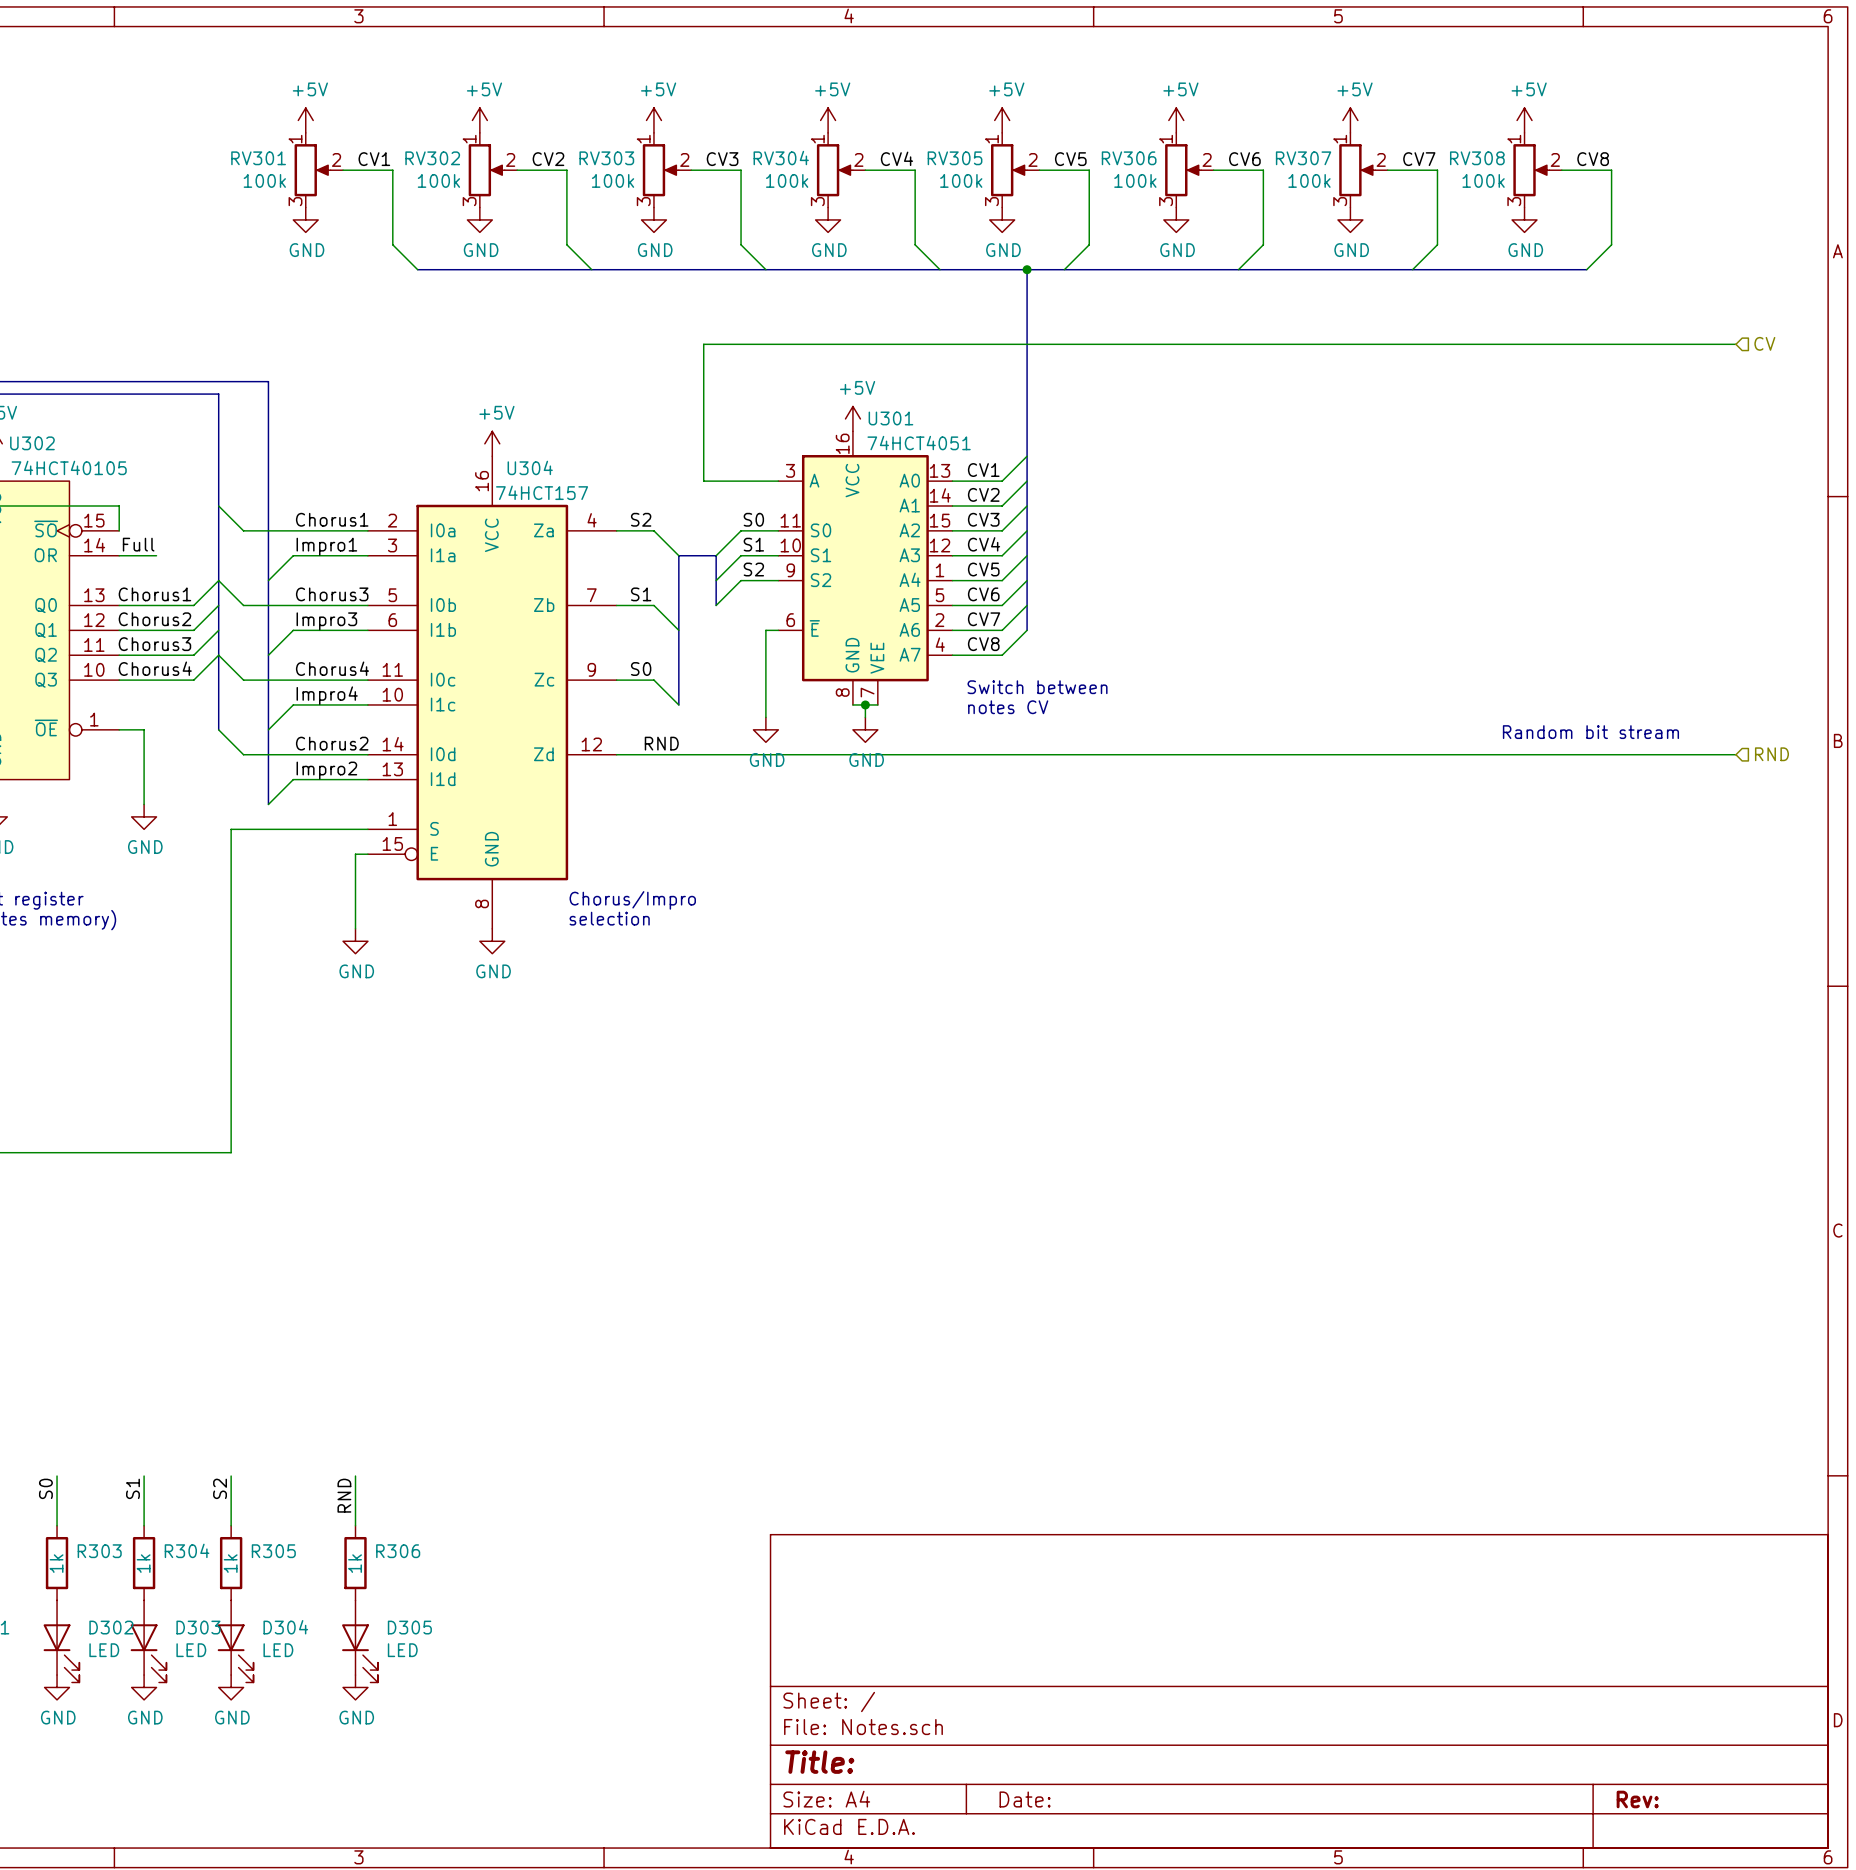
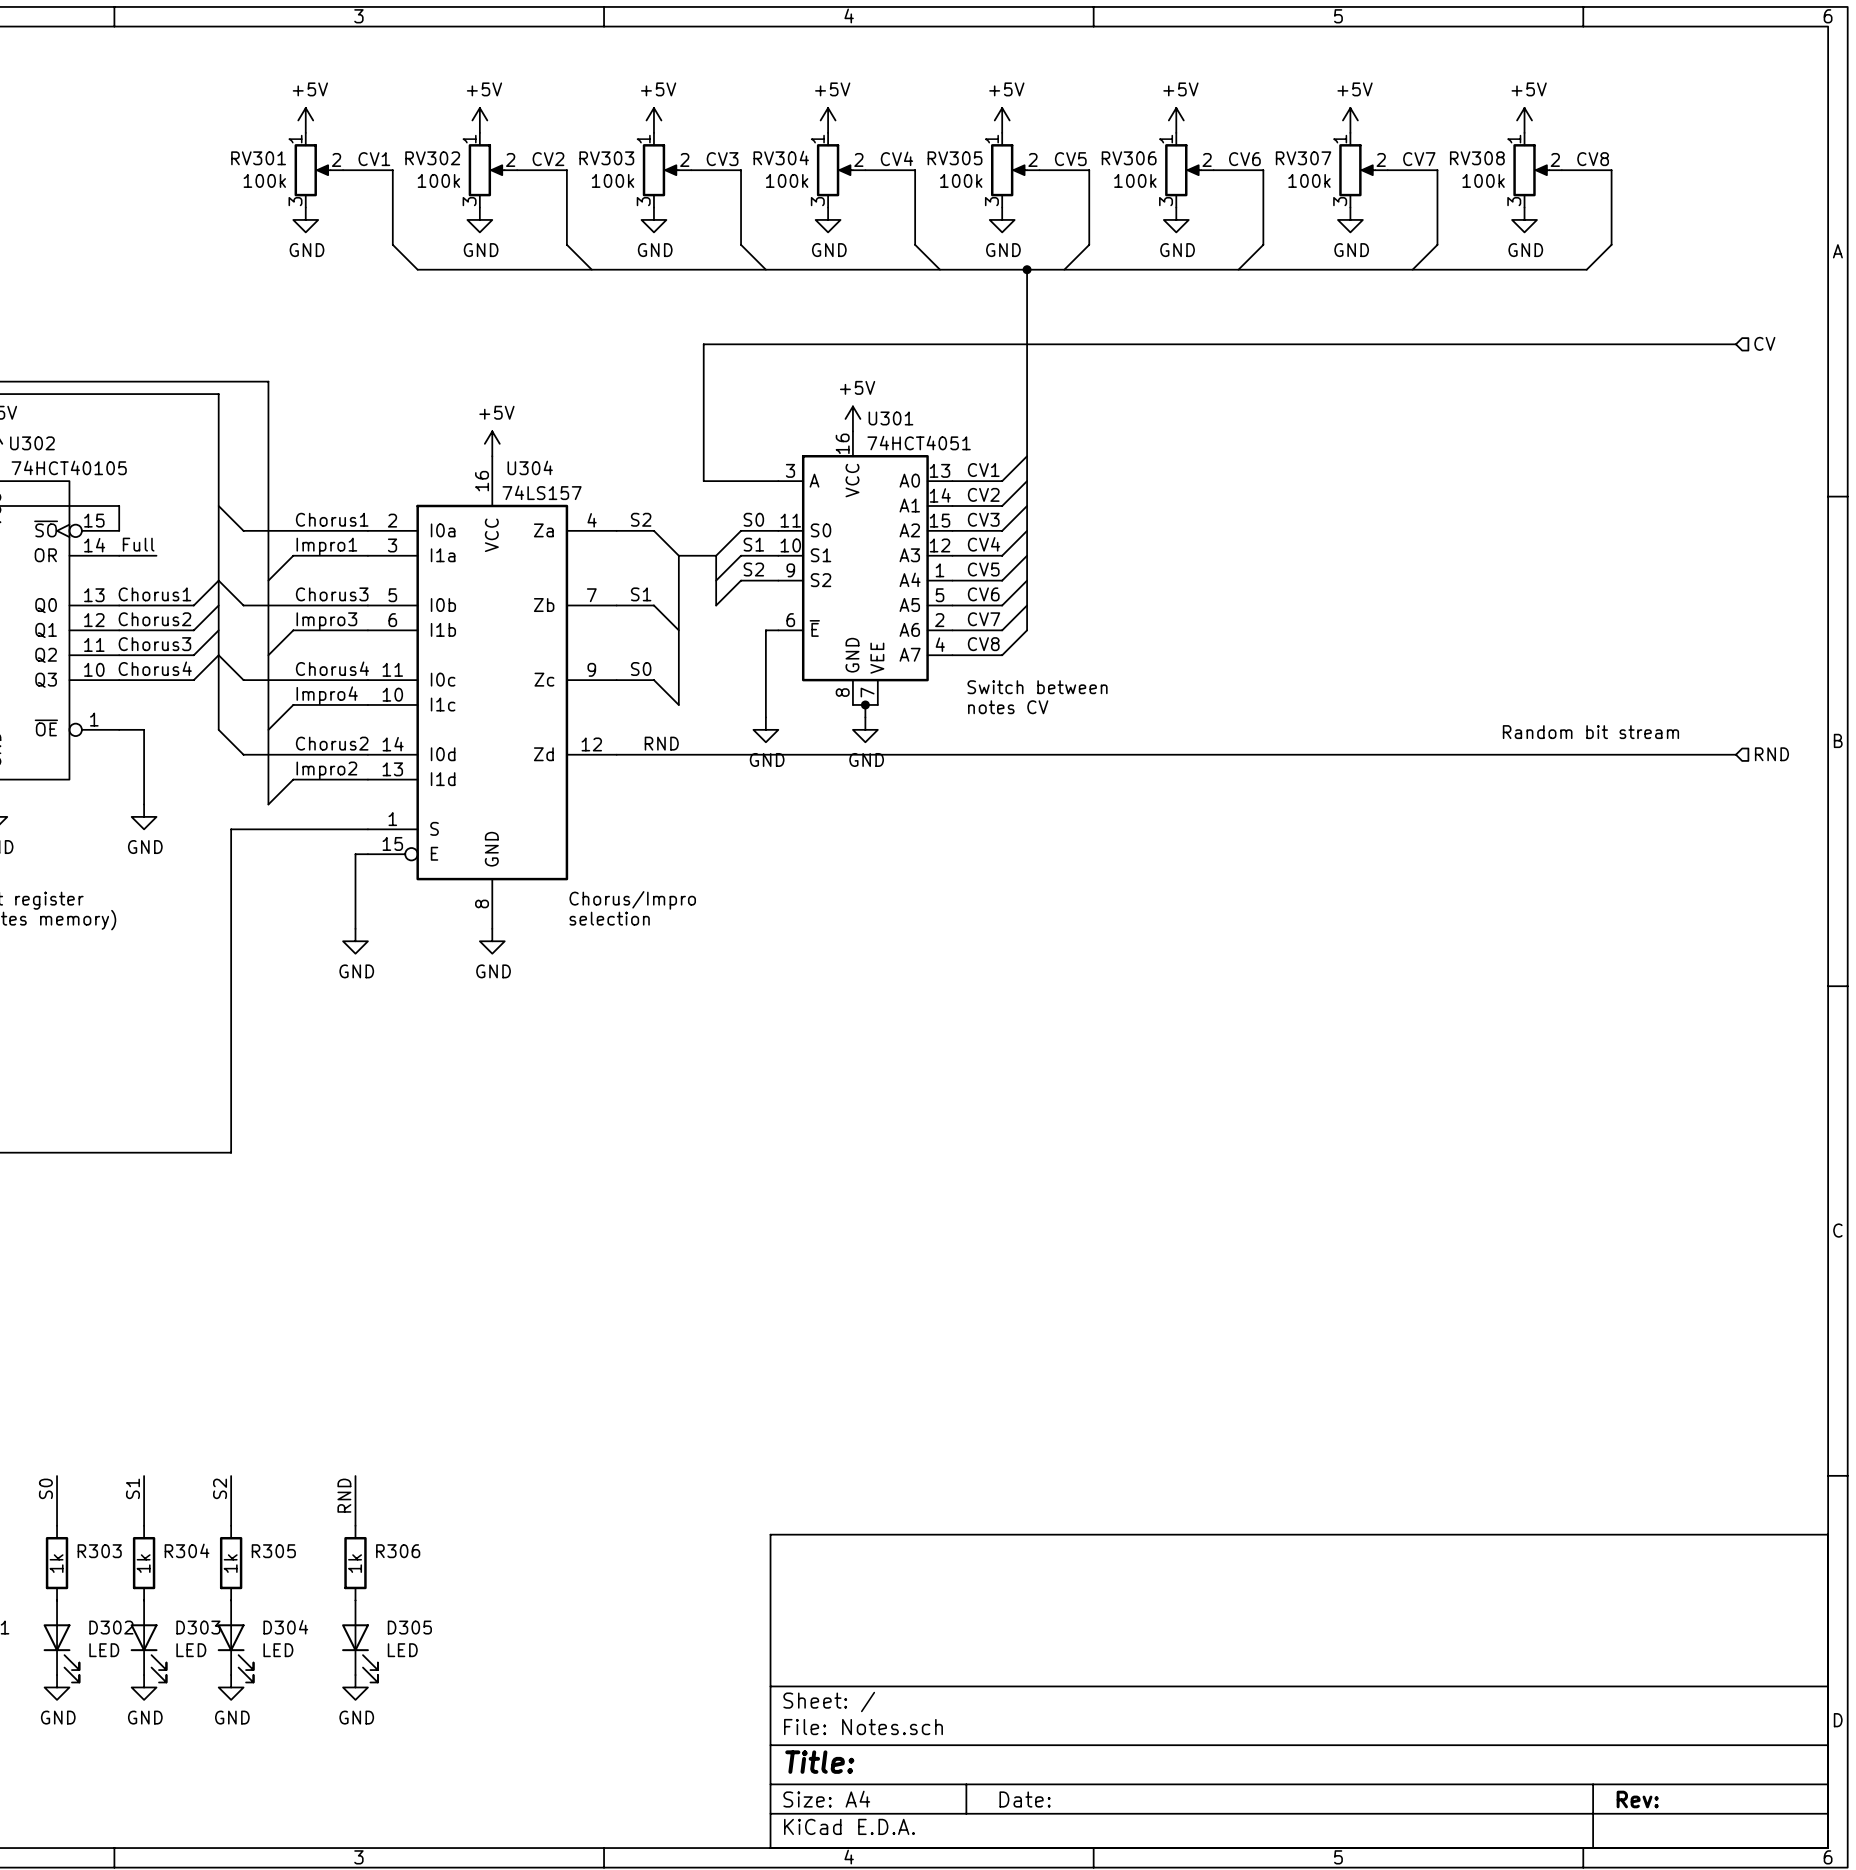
U304 value: 74HCT157 (542, 492) -> 74LS157 (542, 492)

